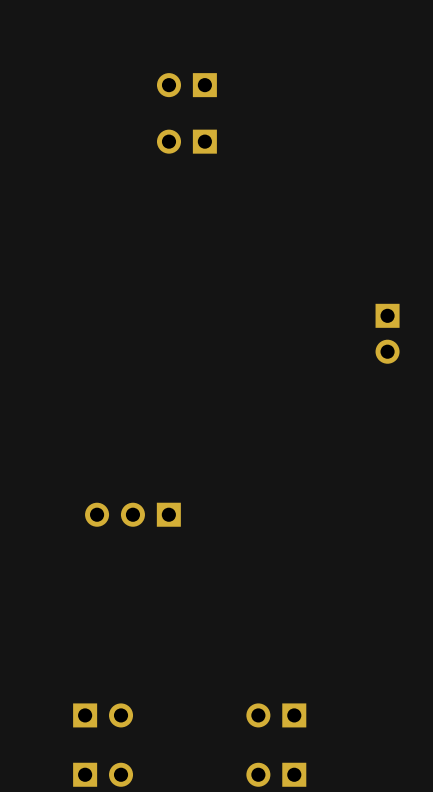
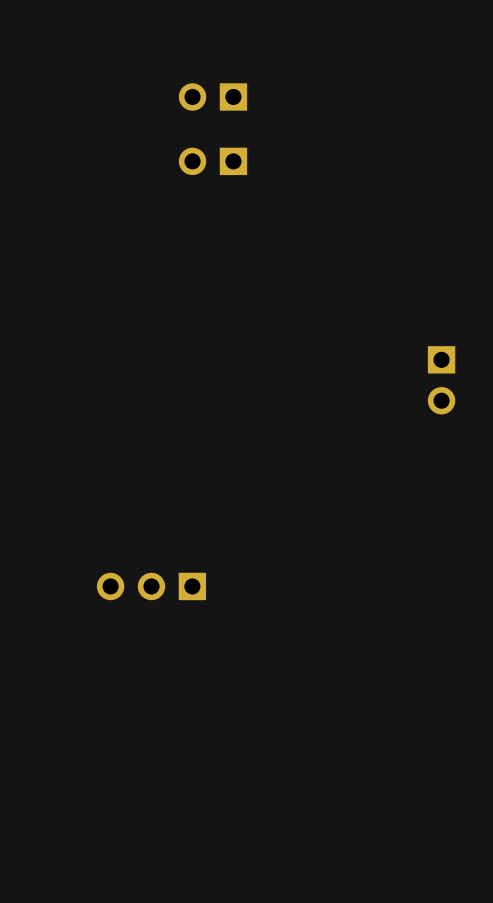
part: (103, 715) -> none
part: (276, 715) -> none
part: (103, 774) -> none
part: (276, 774) -> none

